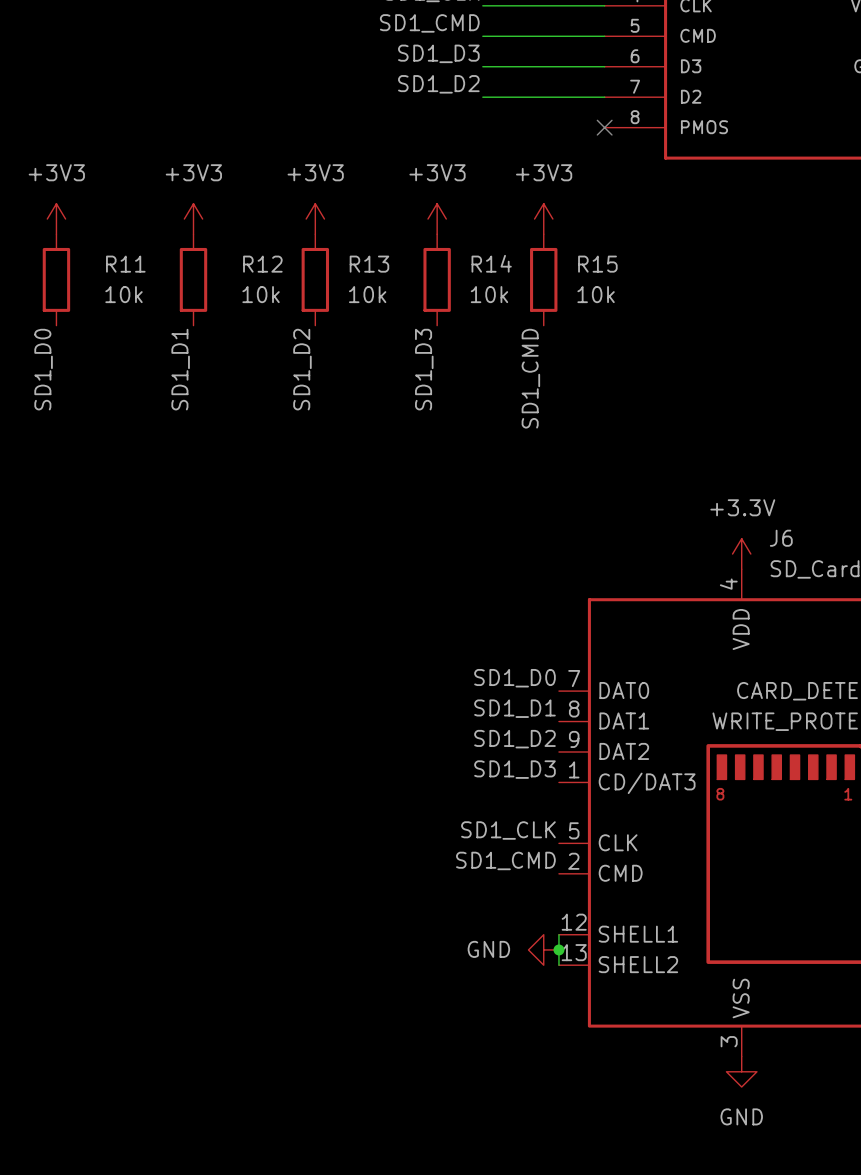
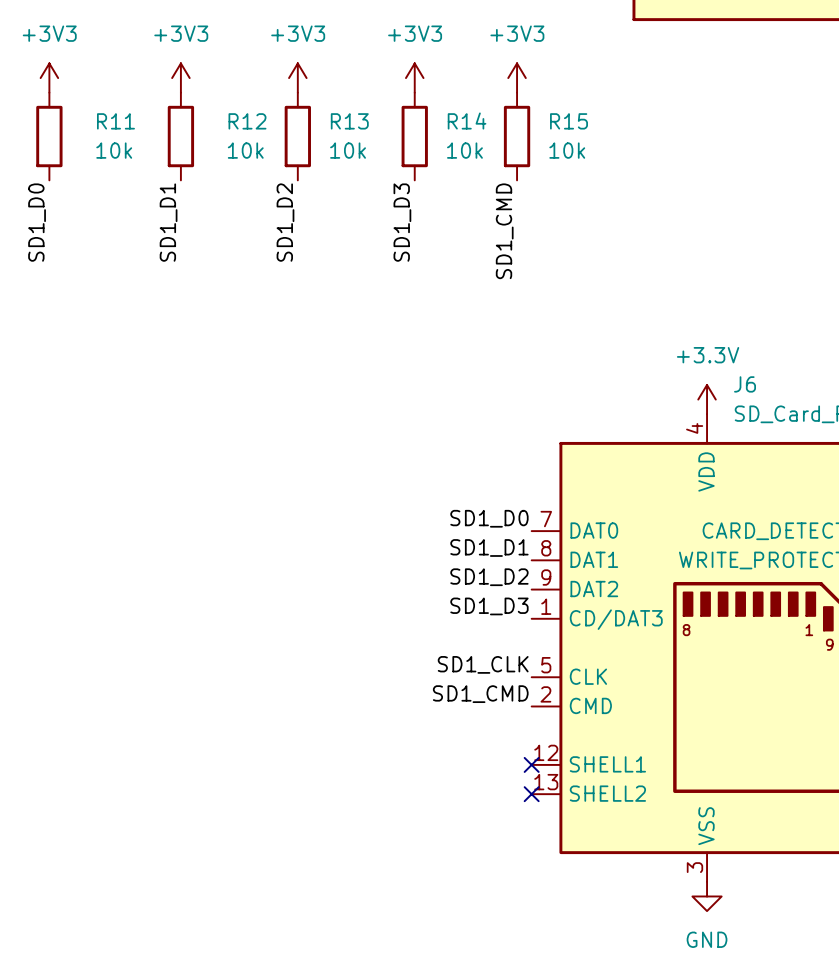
wire: (558, 934) (558, 965) -> none
no-connect mark: none -> (531, 764)
power symbol: GND (543, 949) -> none
junction: (558, 949) -> none
no-connect mark: none -> (531, 794)

